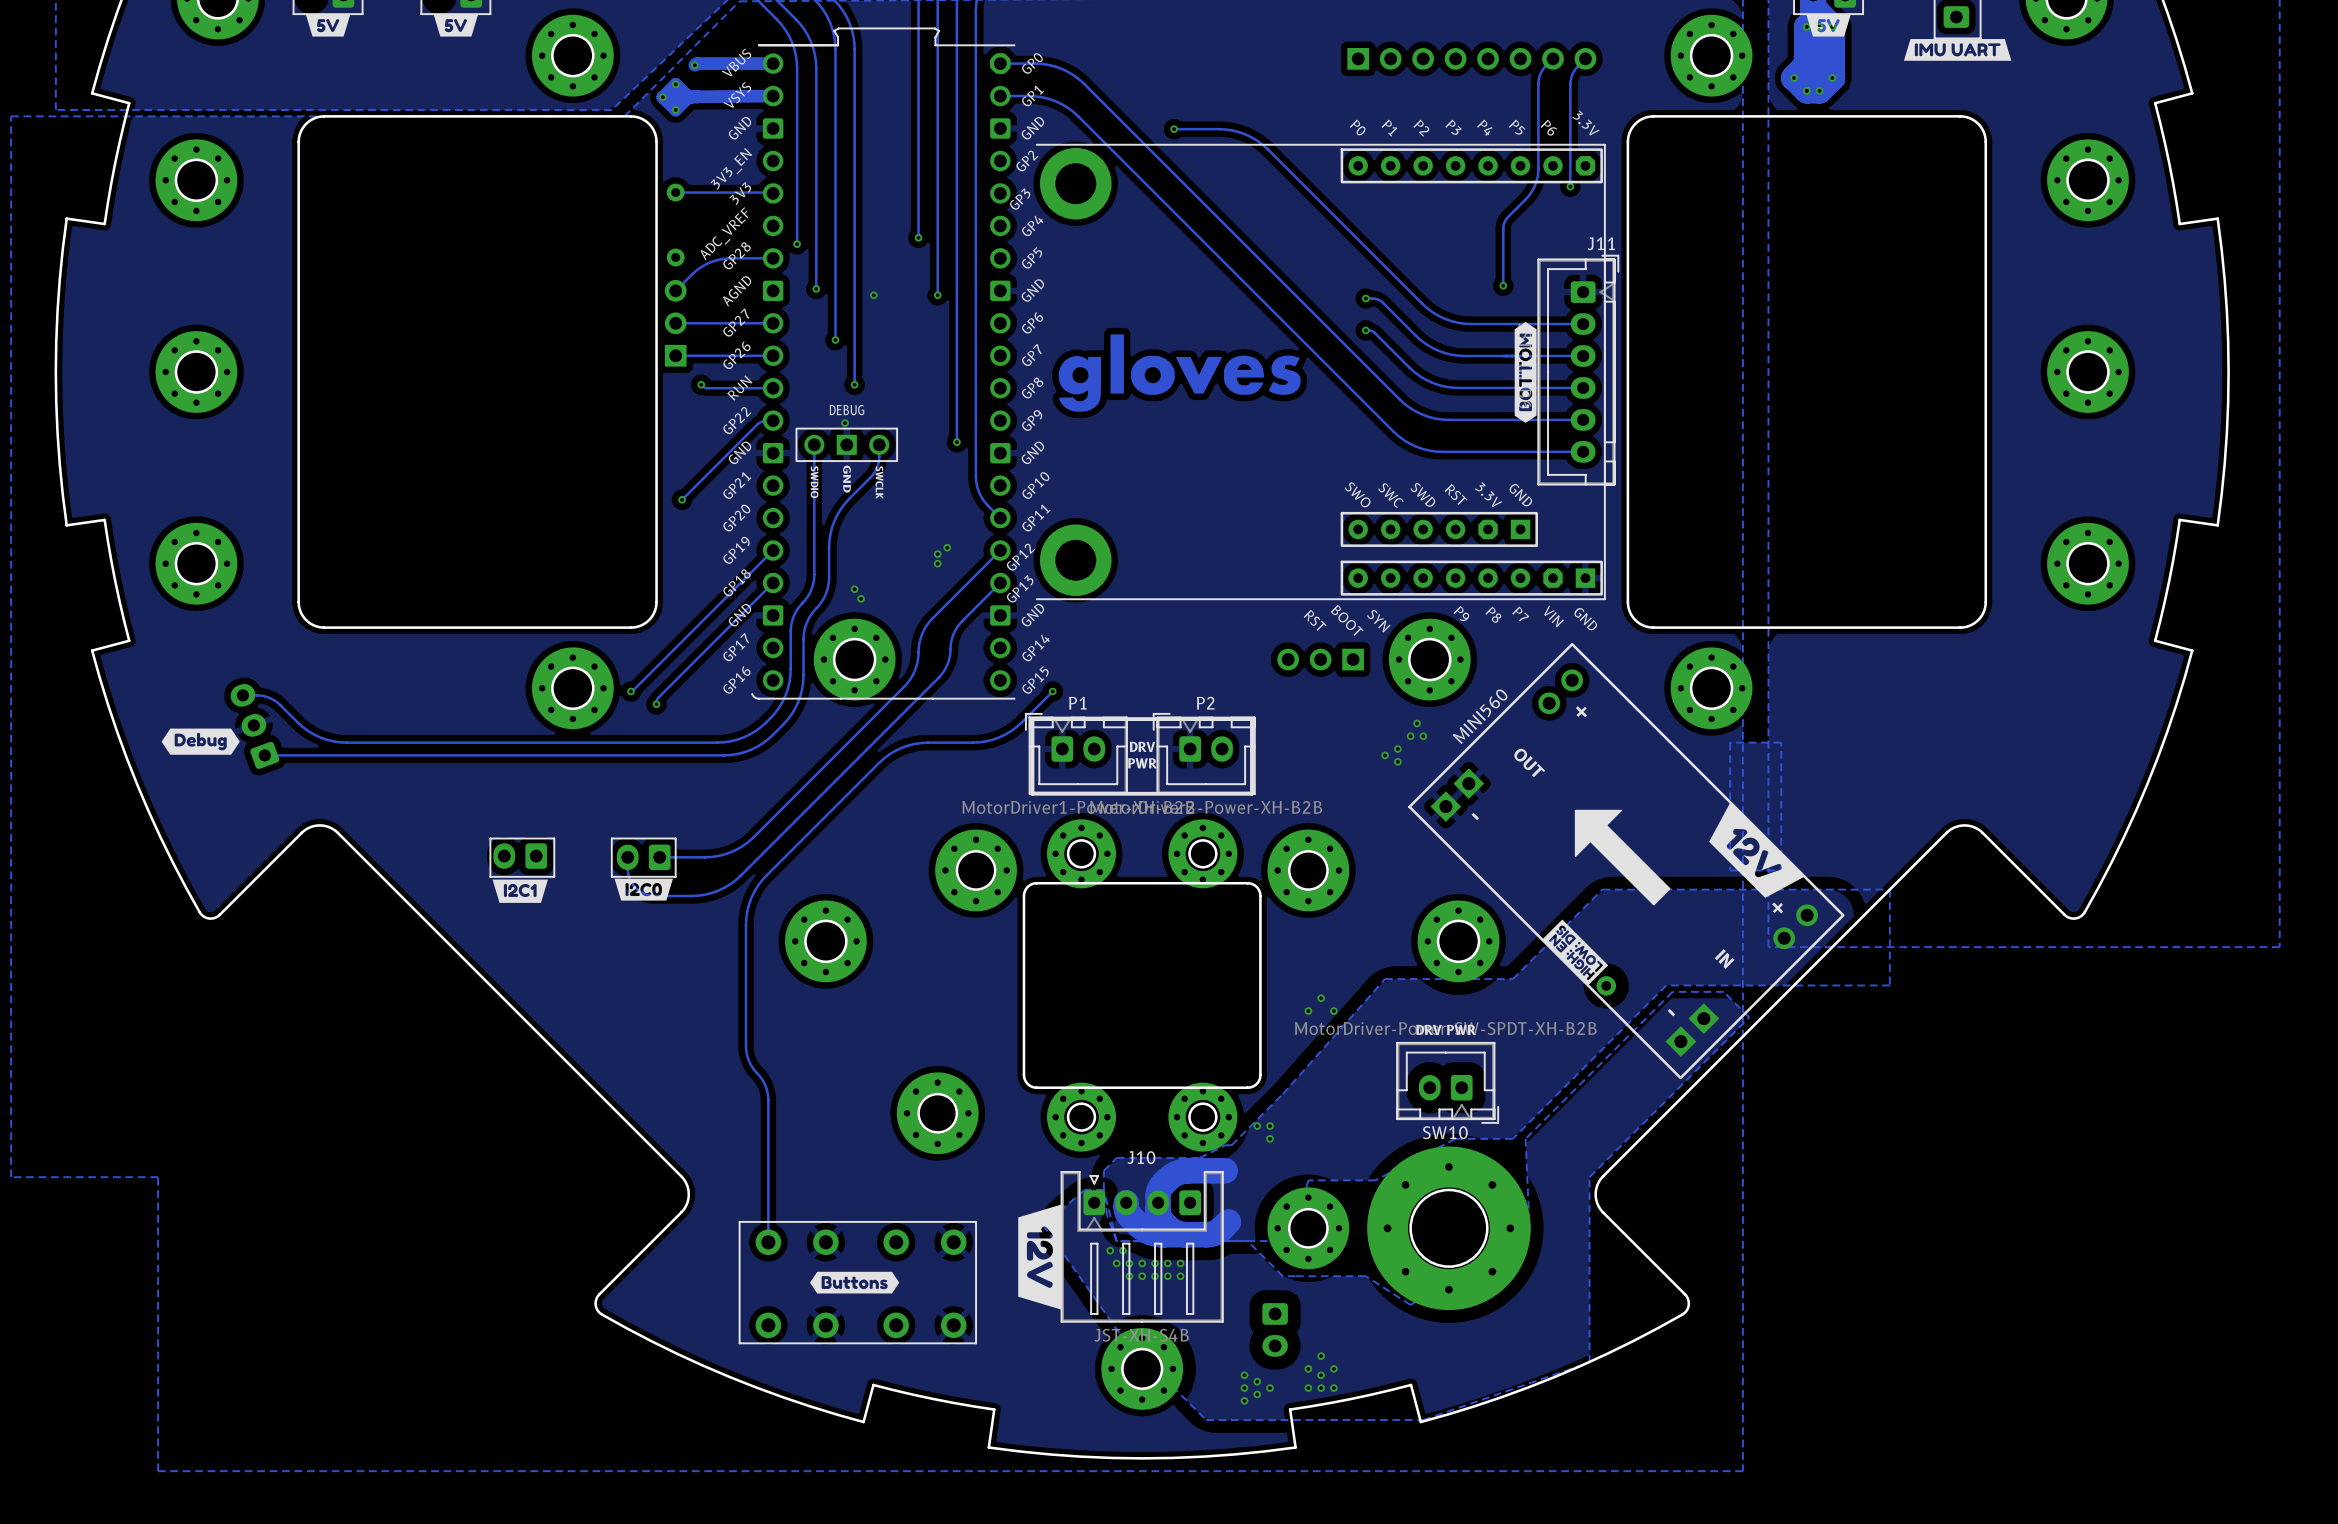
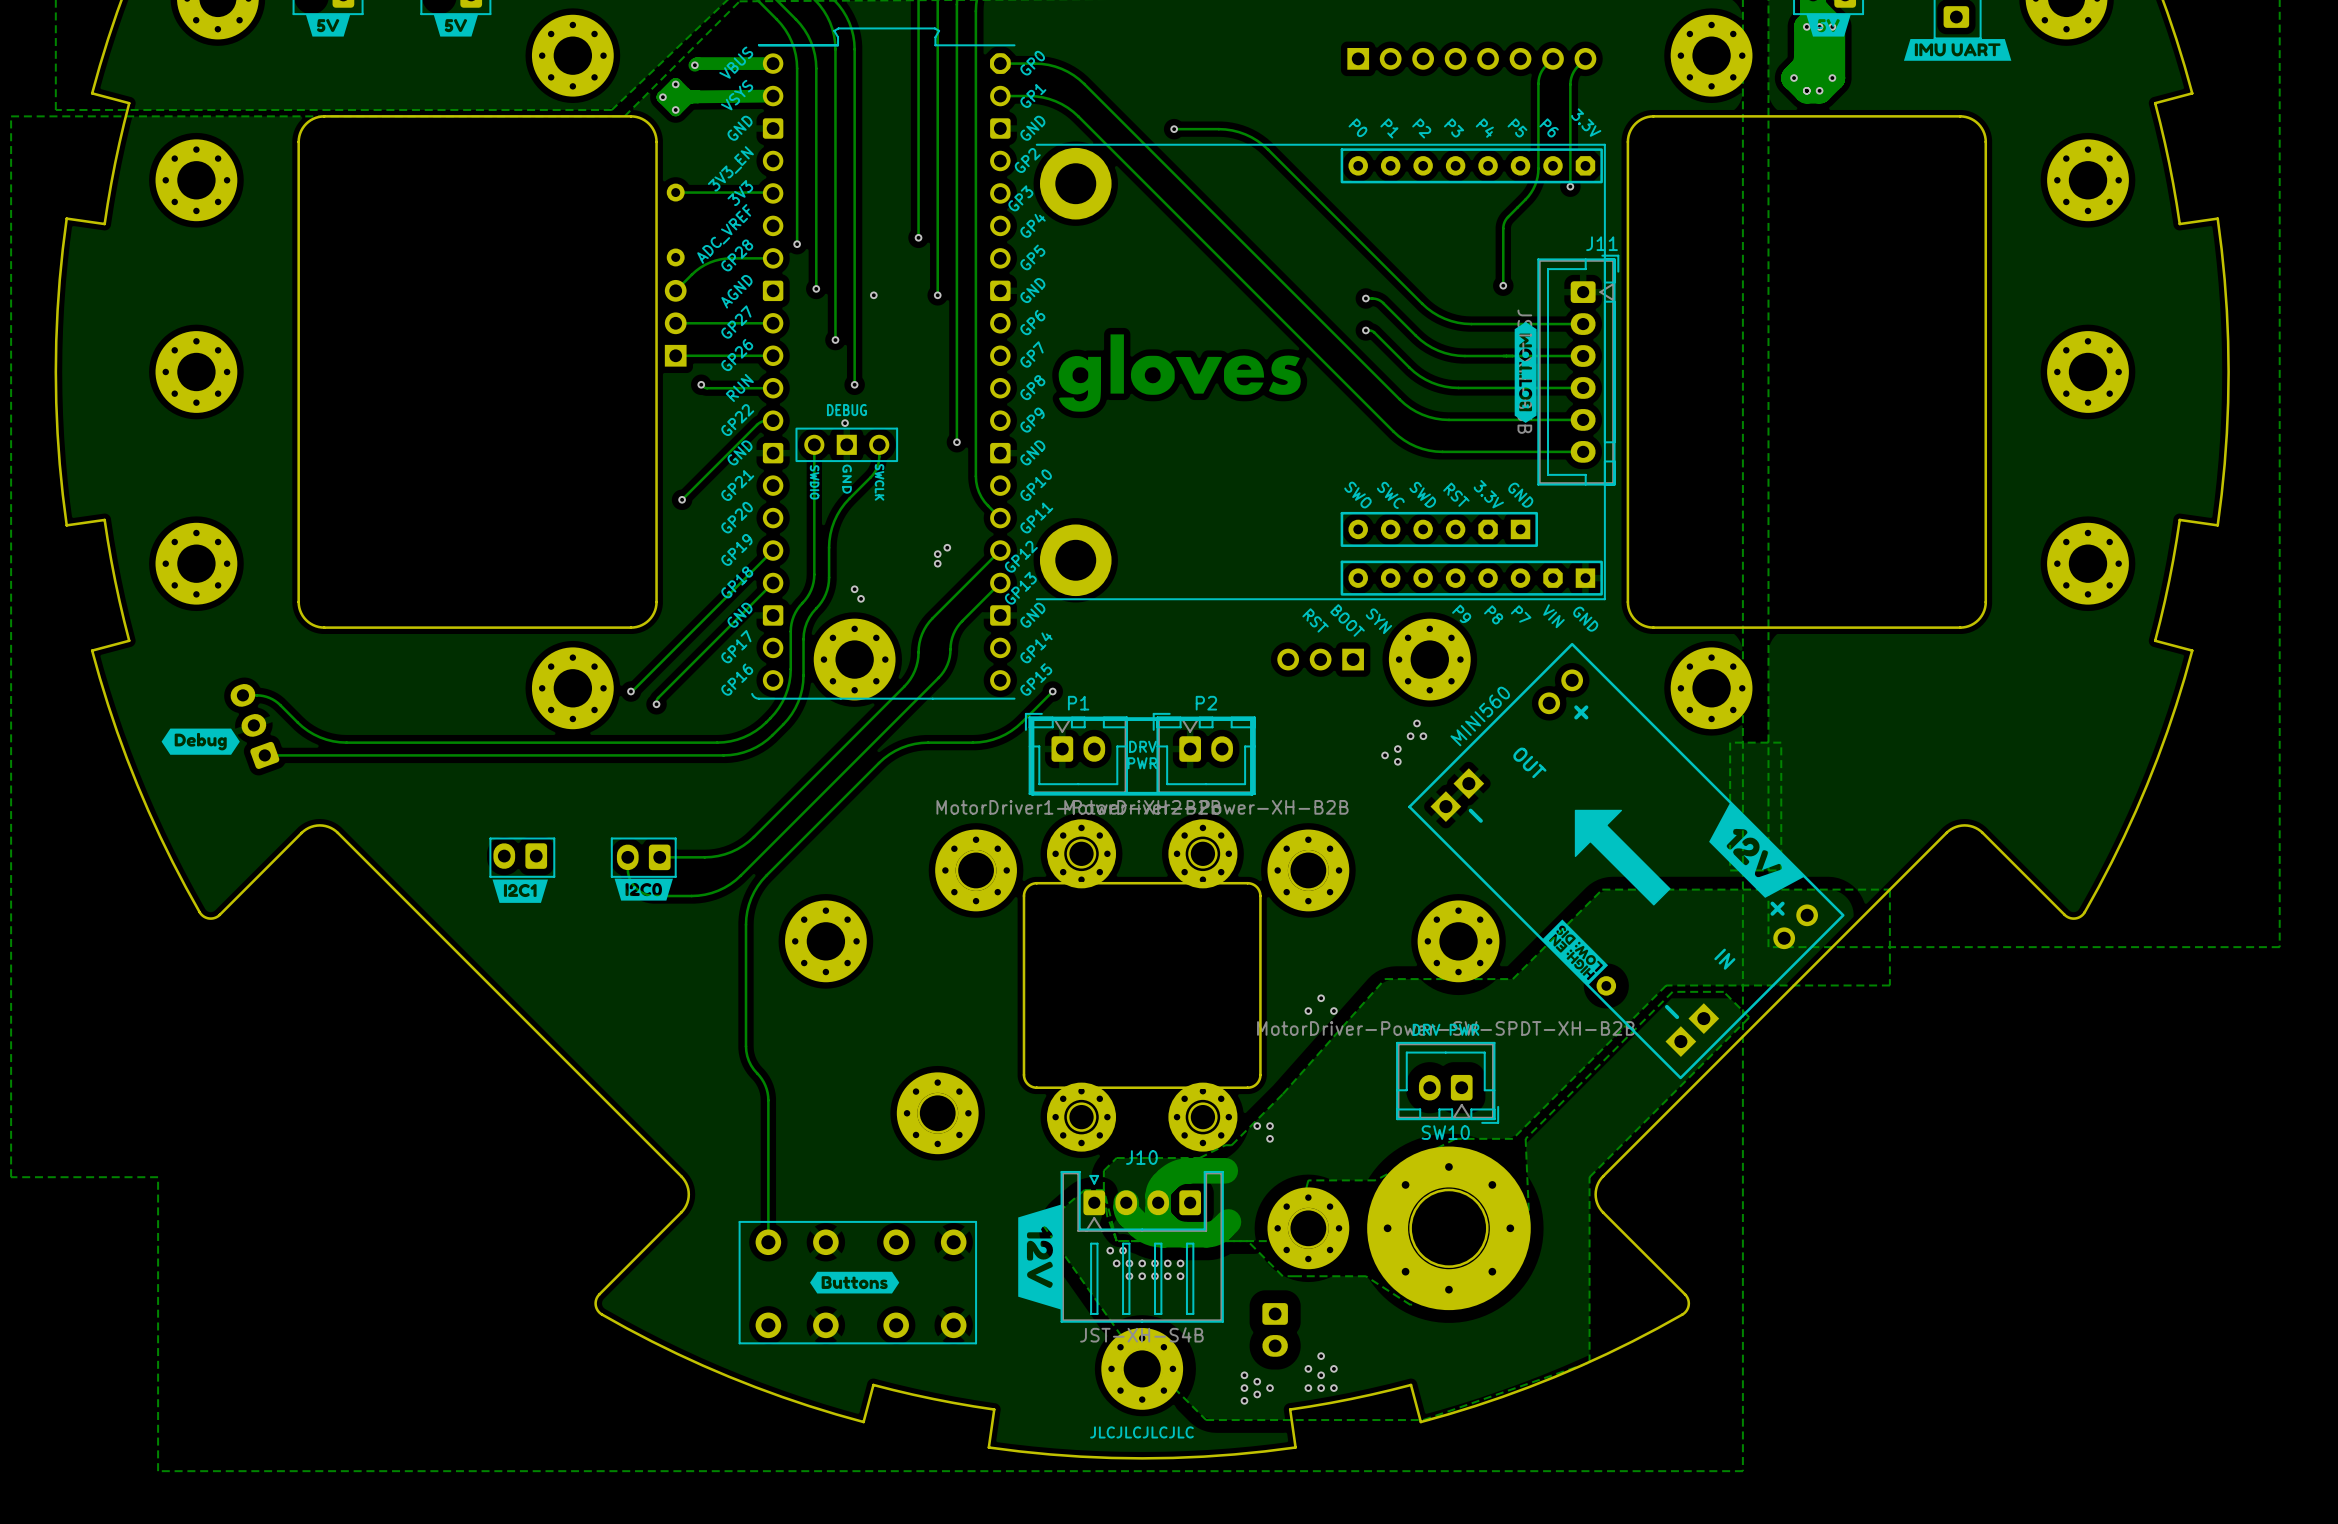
text: none -> JLCJLCJLCJLC (1141, 1432)

